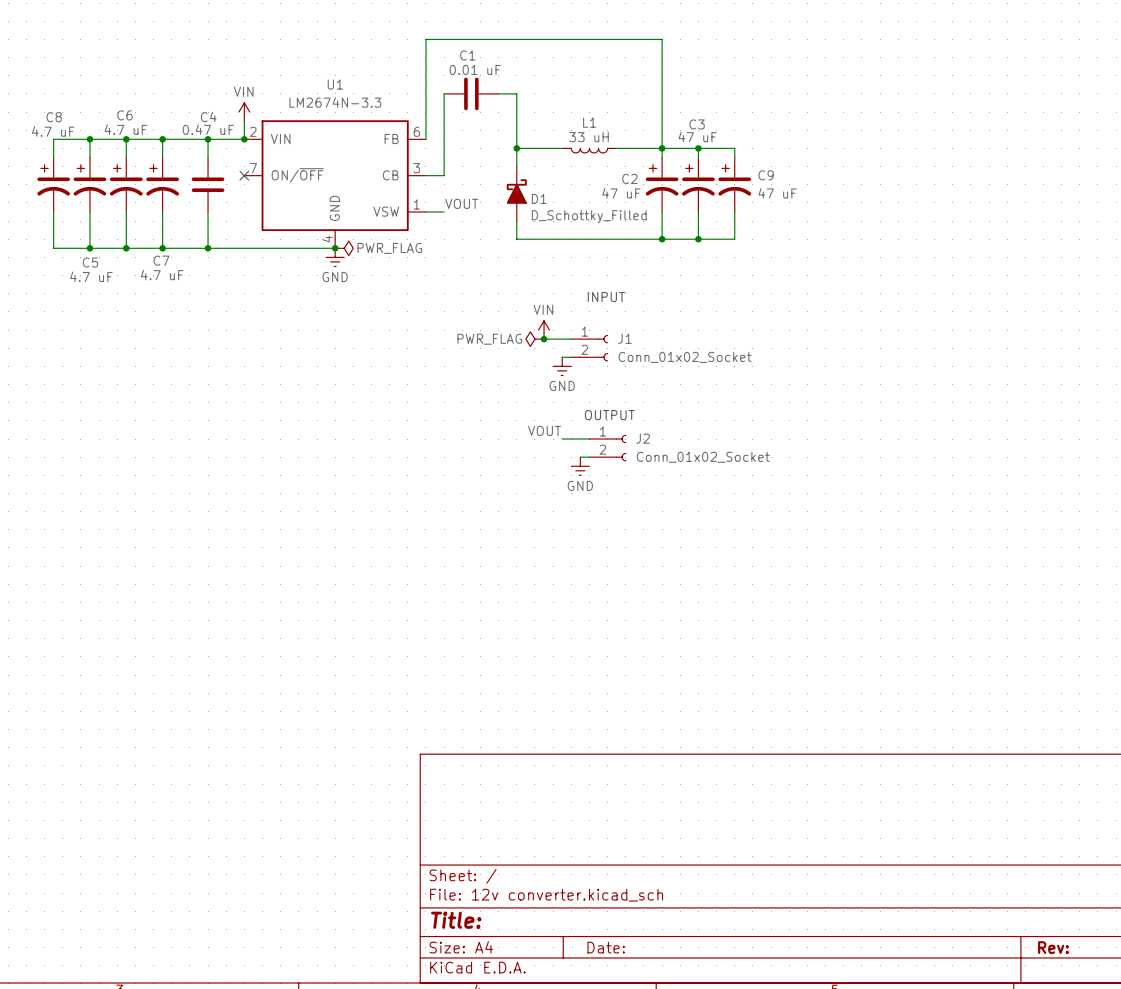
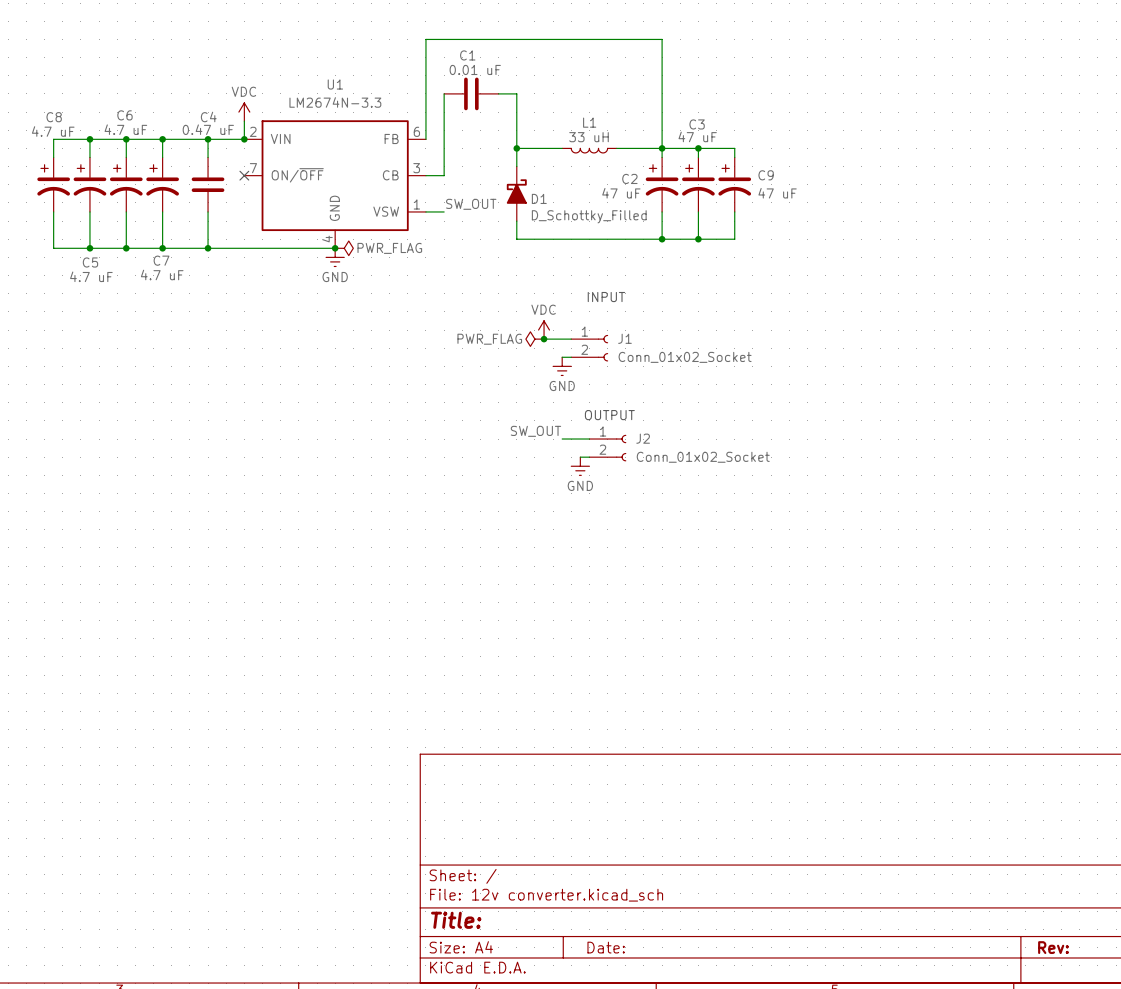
power symbol: VIN (244, 112) -> VDC (244, 112)
label: VOUT (461, 203) -> SW_OUT (471, 204)
power symbol: VIN (544, 330) -> VDC (544, 330)
label: VOUT (544, 430) -> SW_OUT (535, 431)

